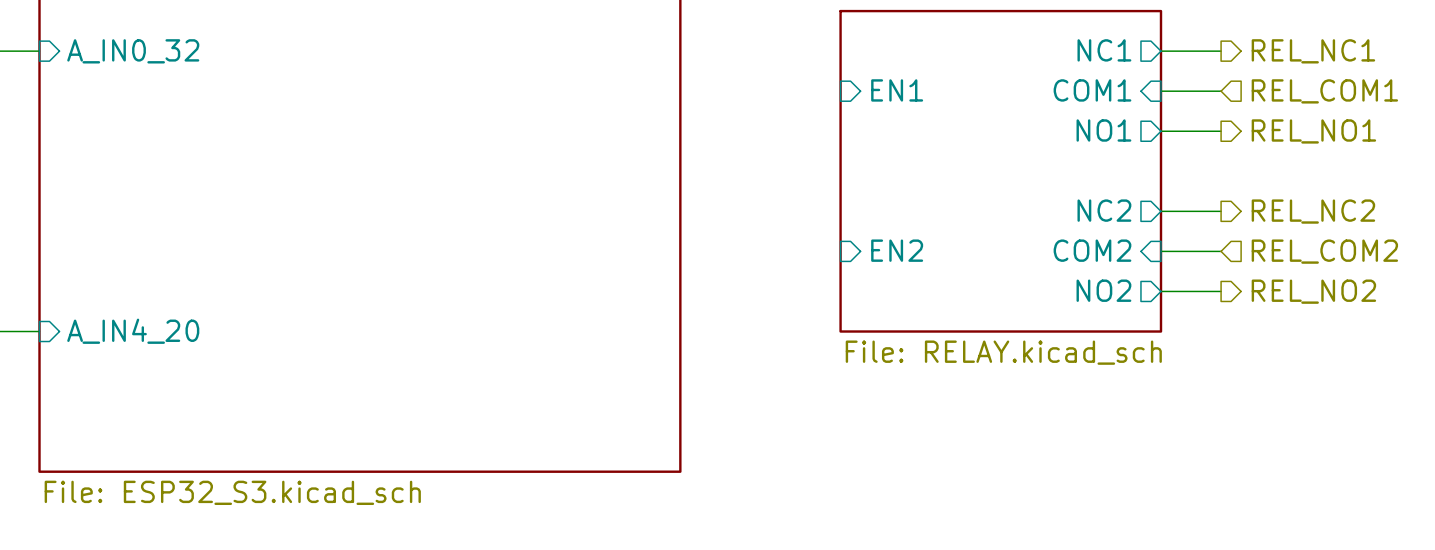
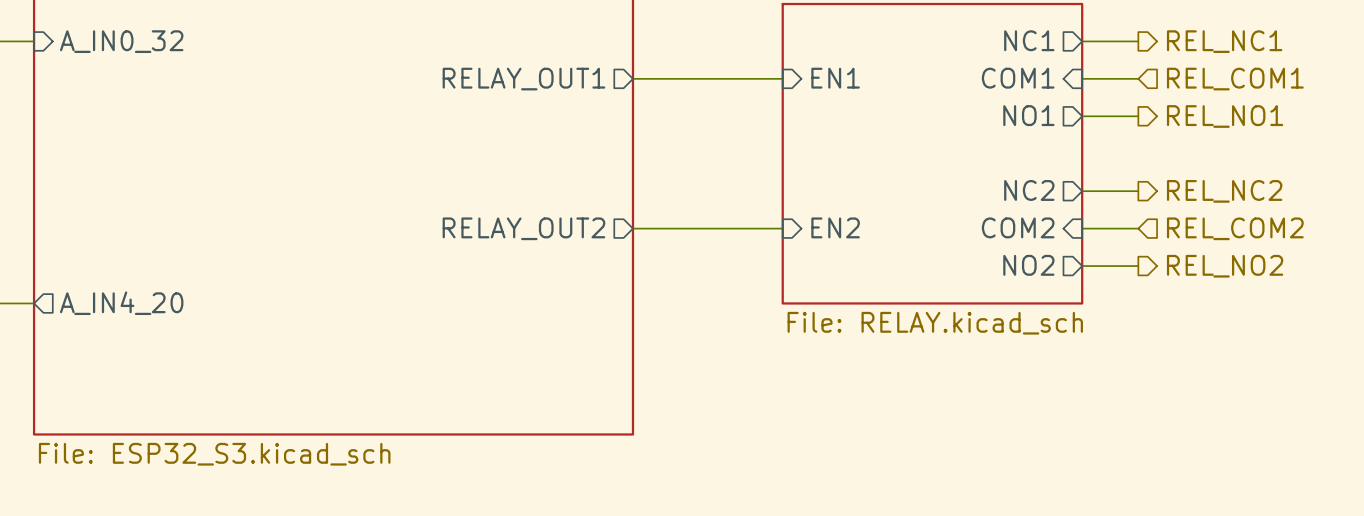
sheet pin: none -> RELAY_OUT1 (523, 79)
wire: none -> (632, 78) (782, 78)
sheet pin: none -> RELAY_OUT2 (523, 228)
wire: none -> (632, 228) (782, 228)
sheet pin shape: input (133, 331) -> output (121, 303)

